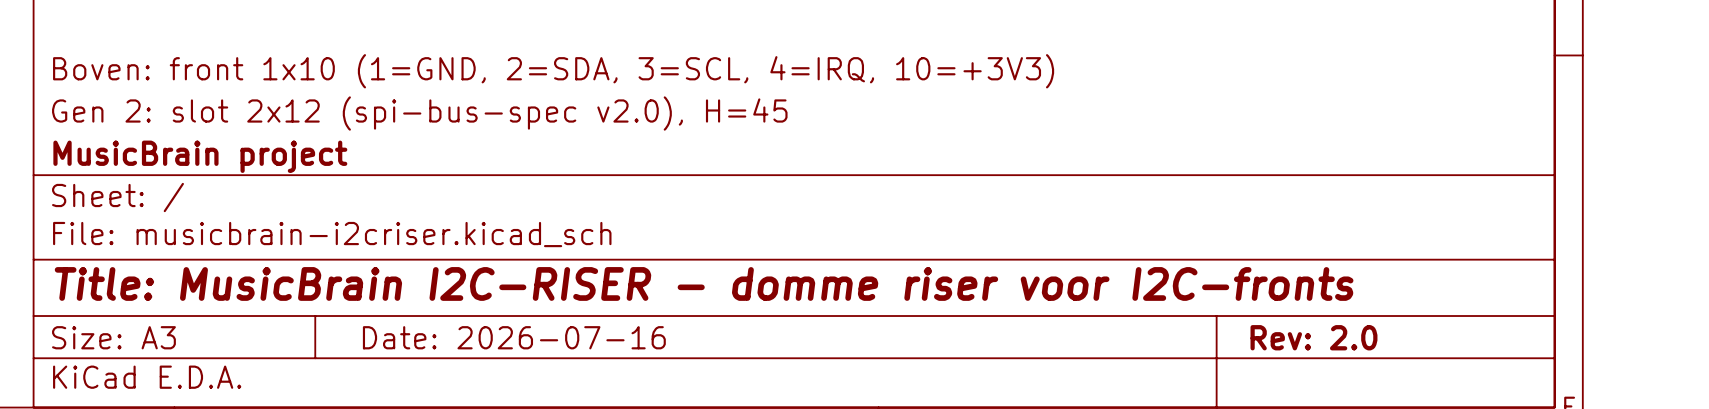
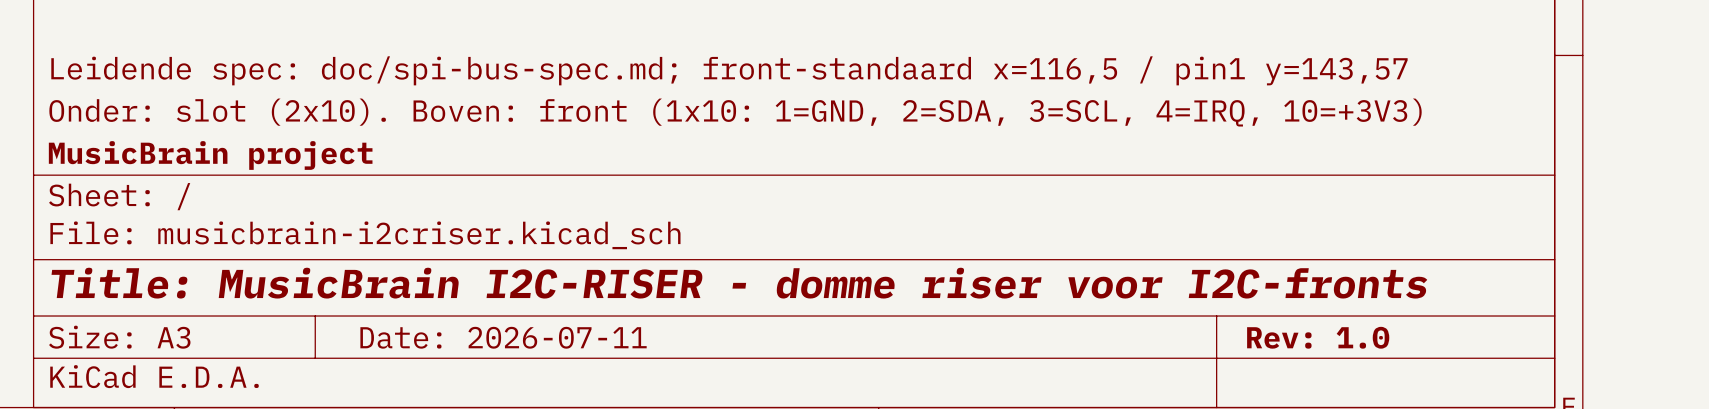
title block: Boven: front 1x10 (1=GND, 2=SDA, 3=SCL, 4=IRQ, 10=+3V3) (553, 71) -> Leidende spec: doc/spi-bus-spec.md; front-standaard x=116,5 / pin1 y=143,57 (729, 70)
title block: Gen 2: slot 2x12 (spi-bus-spec v2.0), H=45 (419, 113) -> Onder: slot (2x10). Boven: front (1x10: 1=GND, 2=SDA, 3=SCL, 4=IRQ, 10=+3V3) (735, 112)
title block: Date: 2026-07-16 (514, 337) -> Date: 2026-07-11 (503, 337)
title block: Rev: 2.0 (1313, 337) -> Rev: 1.0 (1318, 337)

